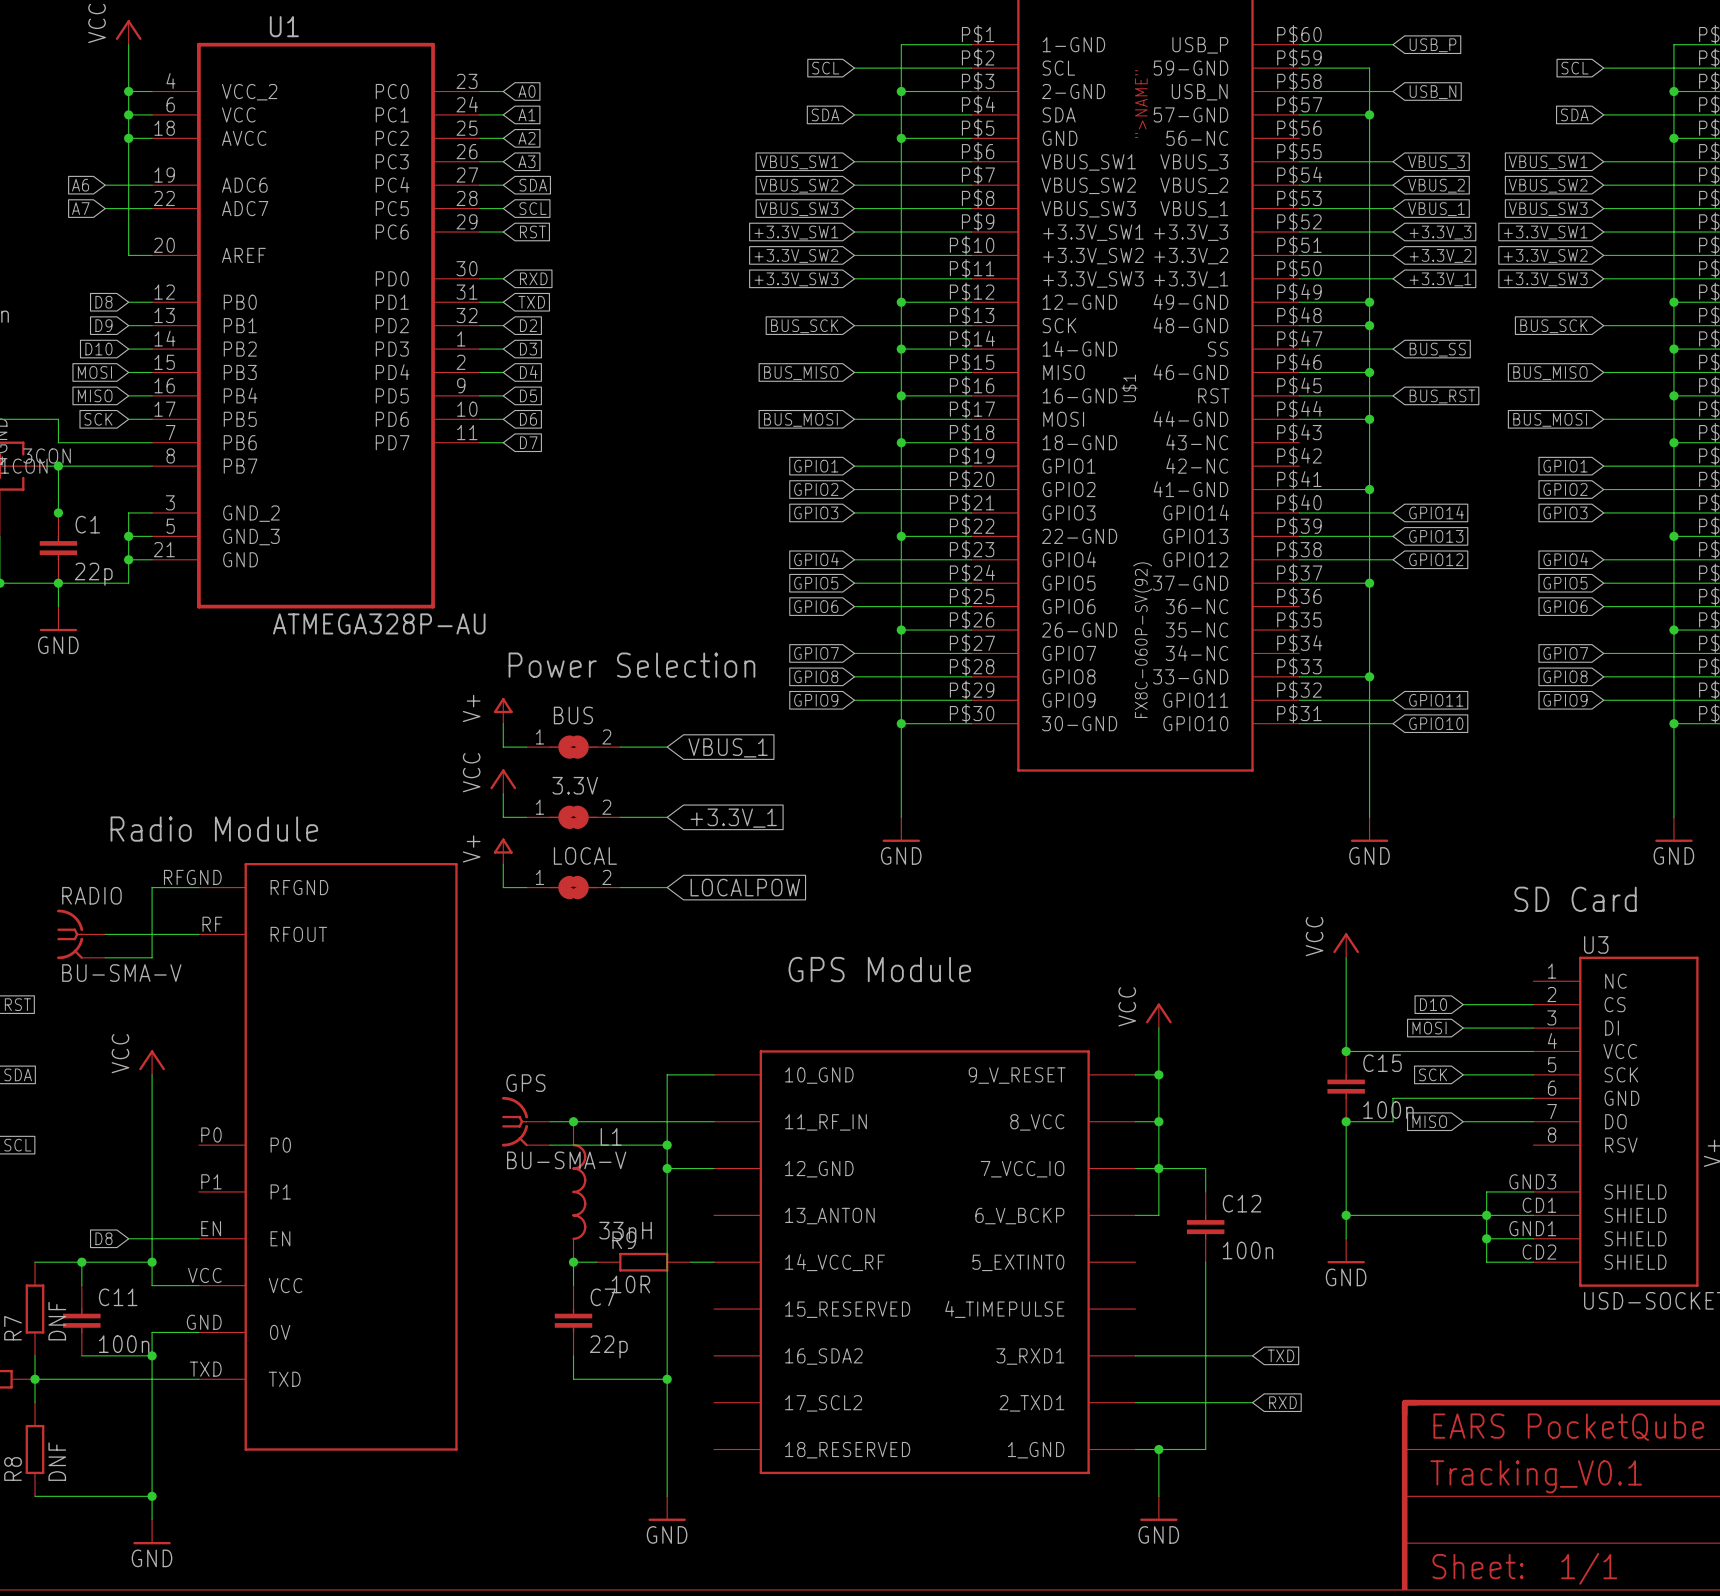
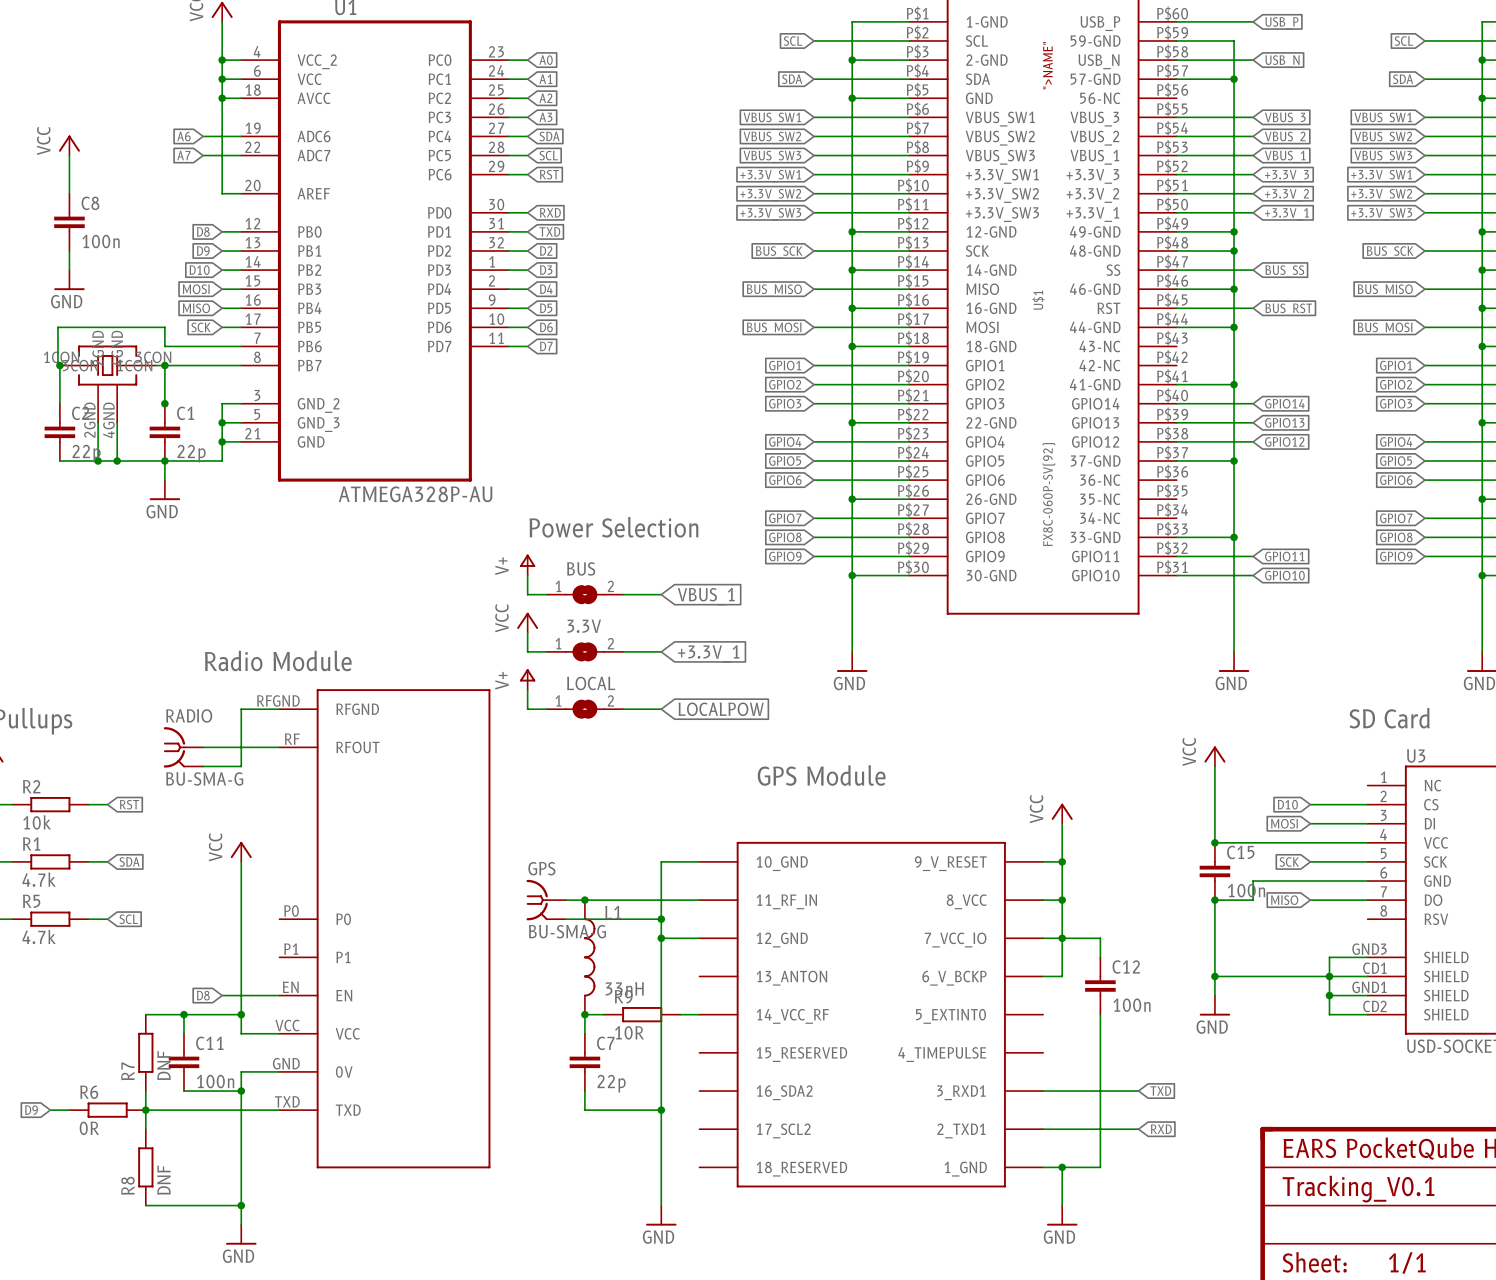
RADIO value: BU-SMA-V (121, 973) -> BU-SMA-G (204, 778)
GPS value: BU-SMA-V (566, 1160) -> BU-SMA-G (567, 931)

